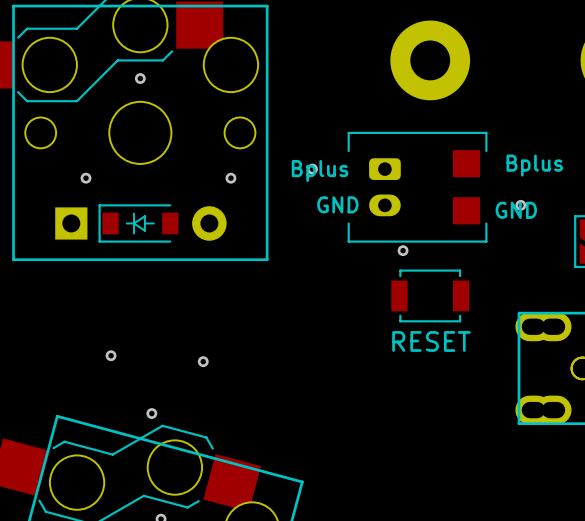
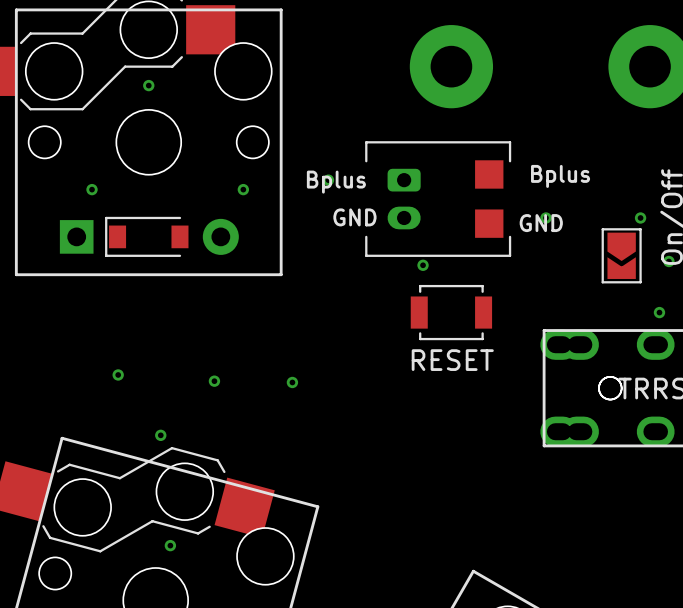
part footprint: [55, 204, 227, 243] -> [59, 216, 239, 257]
via: none -> (292, 382)

